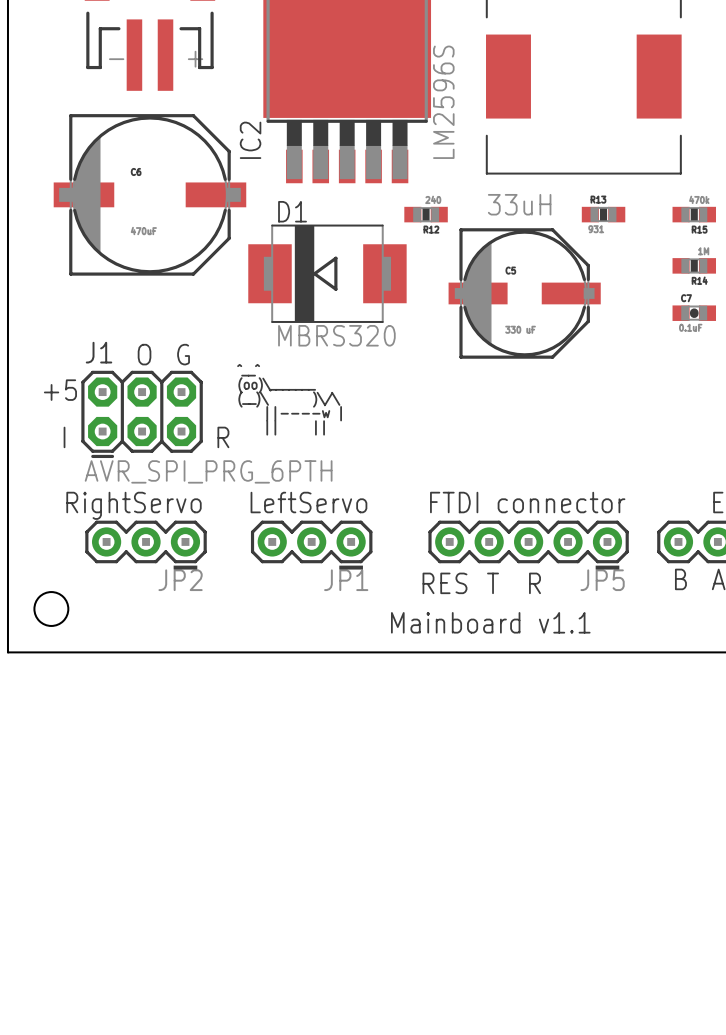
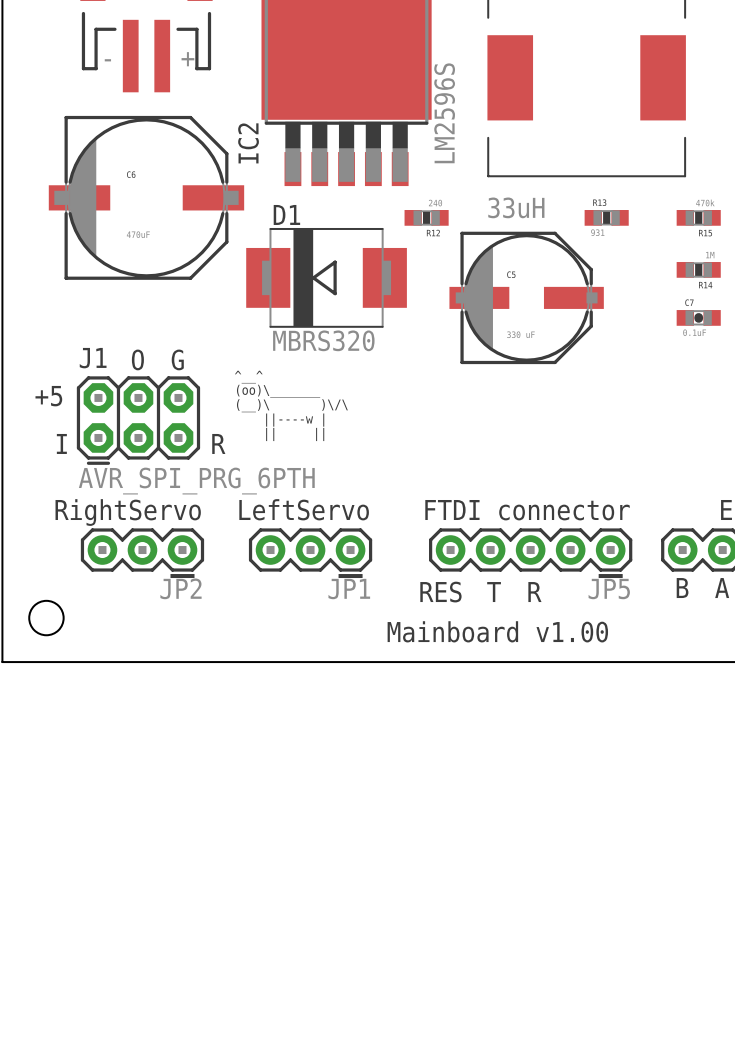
text: Mainboard v1.1 (490, 622) -> Mainboard v1.00 (497, 631)

